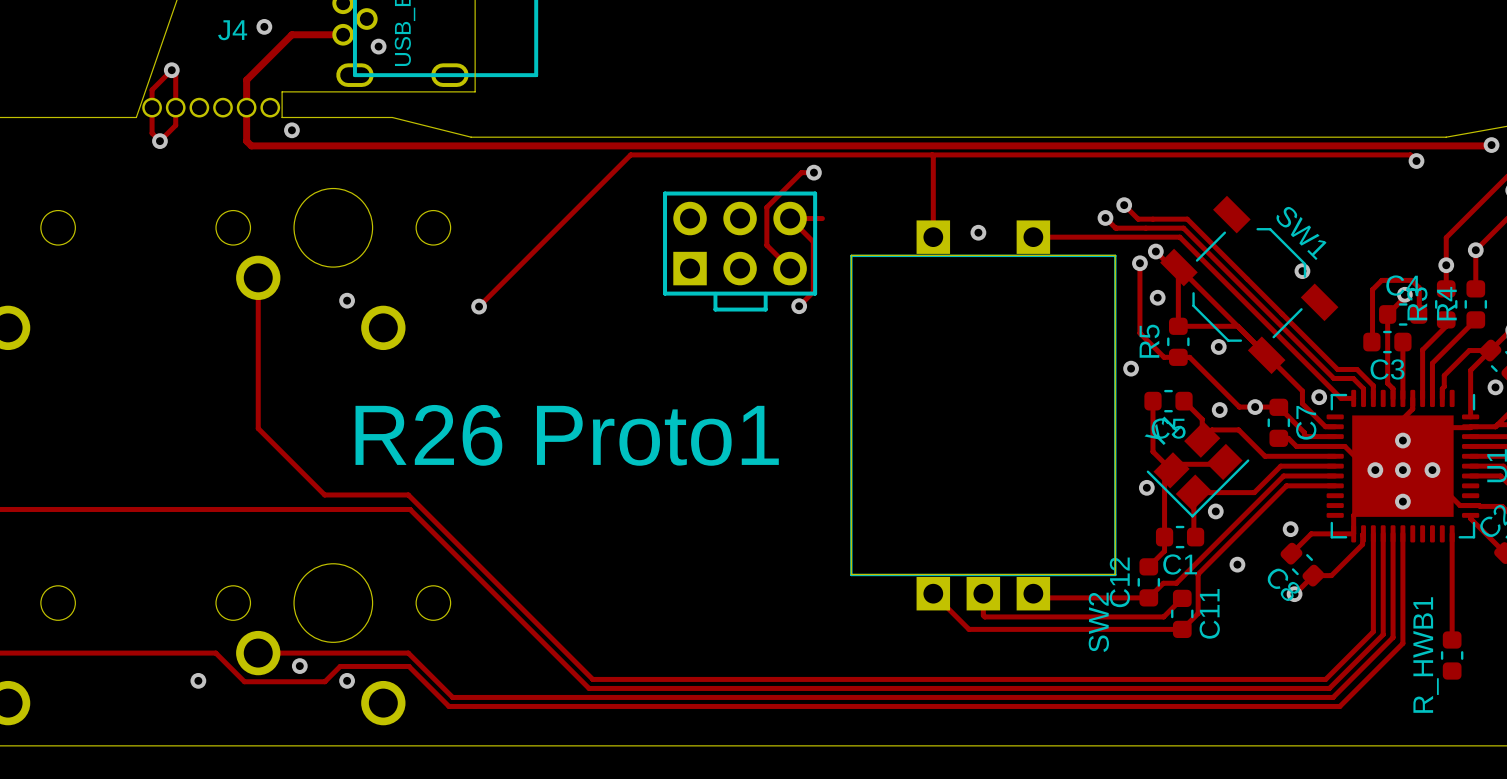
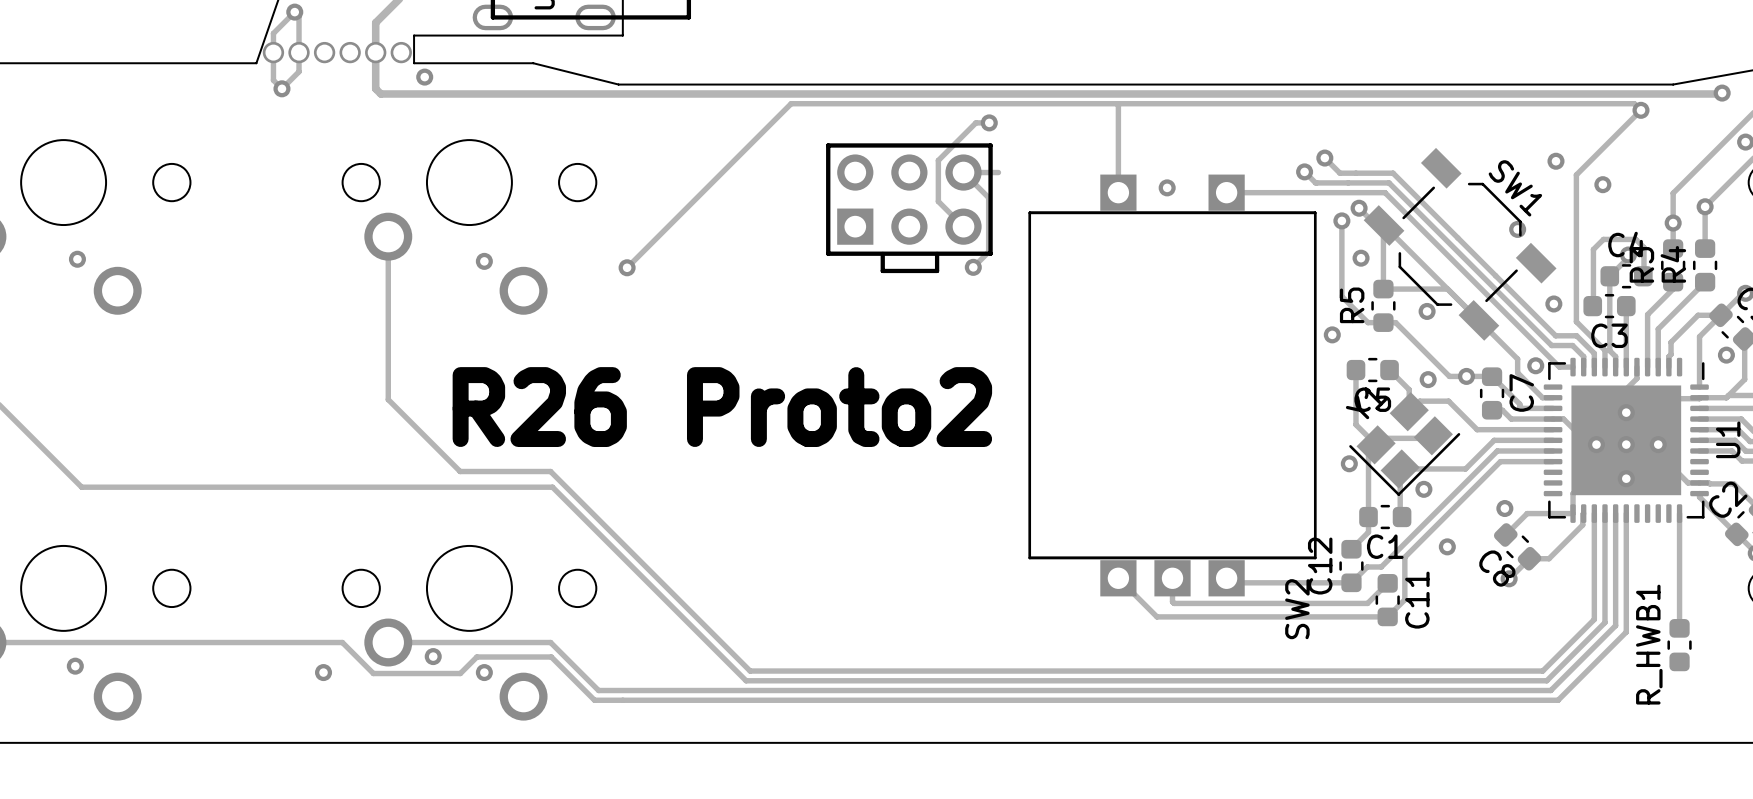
track: none -> (1641, 110) (1576, 174) (1576, 321) (1604, 350) (1604, 367)
via: none -> (1555, 161)
via: none -> (1602, 184)
via: none -> (1553, 303)
text: R26 Proto1 (567, 435) -> R26 Proto2 (722, 407)

